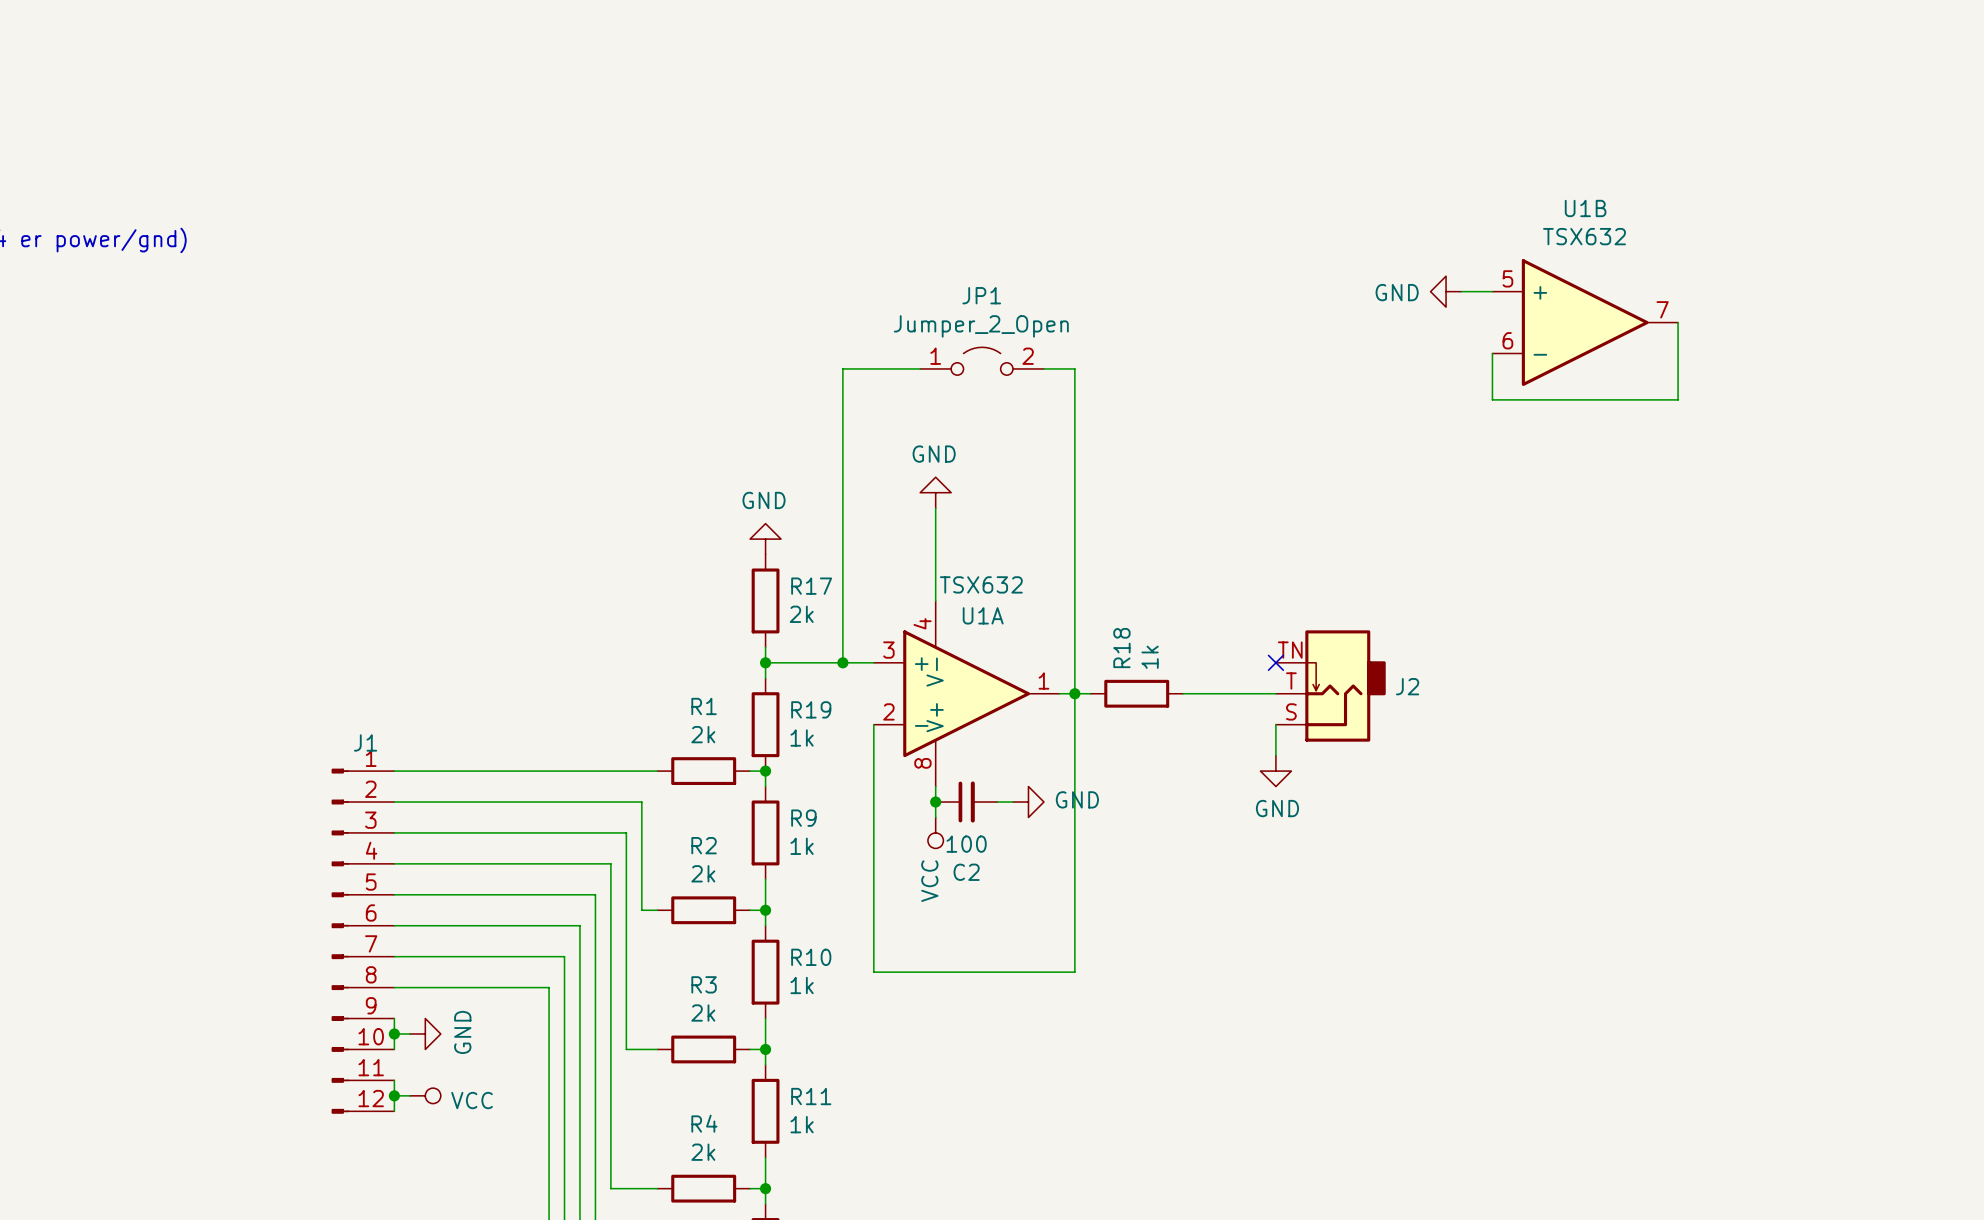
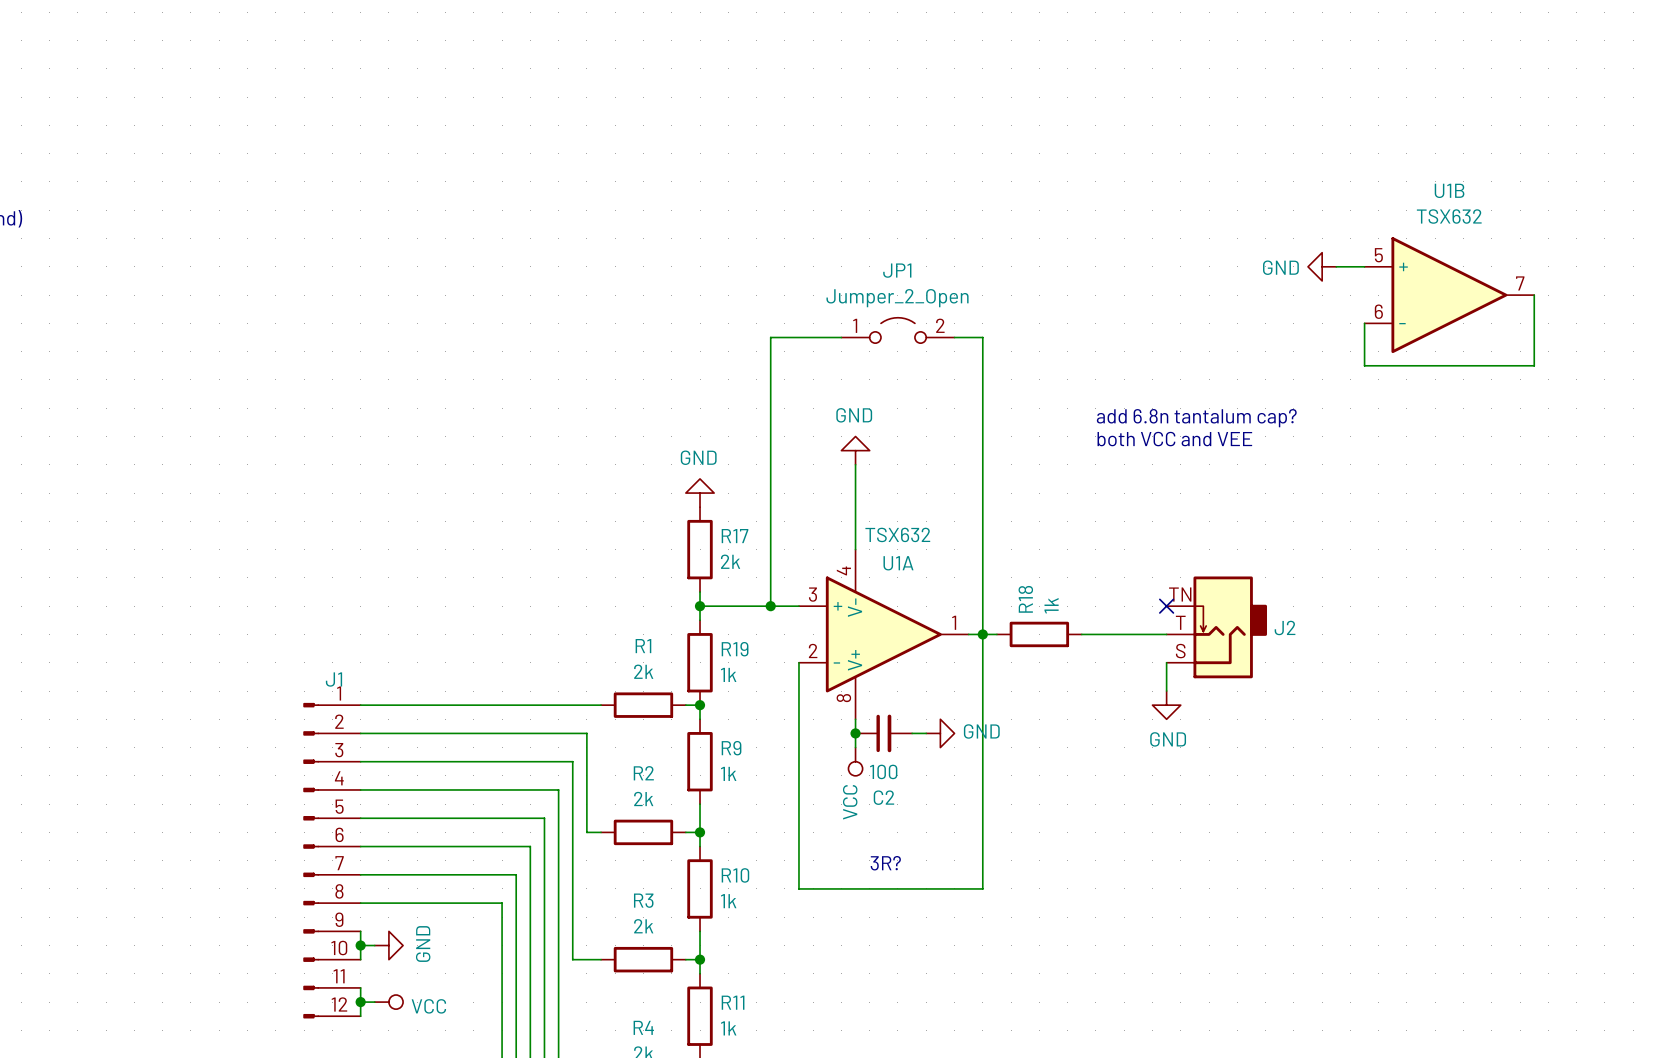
text: none -> add 6.8n tantalum cap? (1196, 418)
text: none -> both VCC and VEE (1174, 439)
text: none -> 3R? (885, 863)

